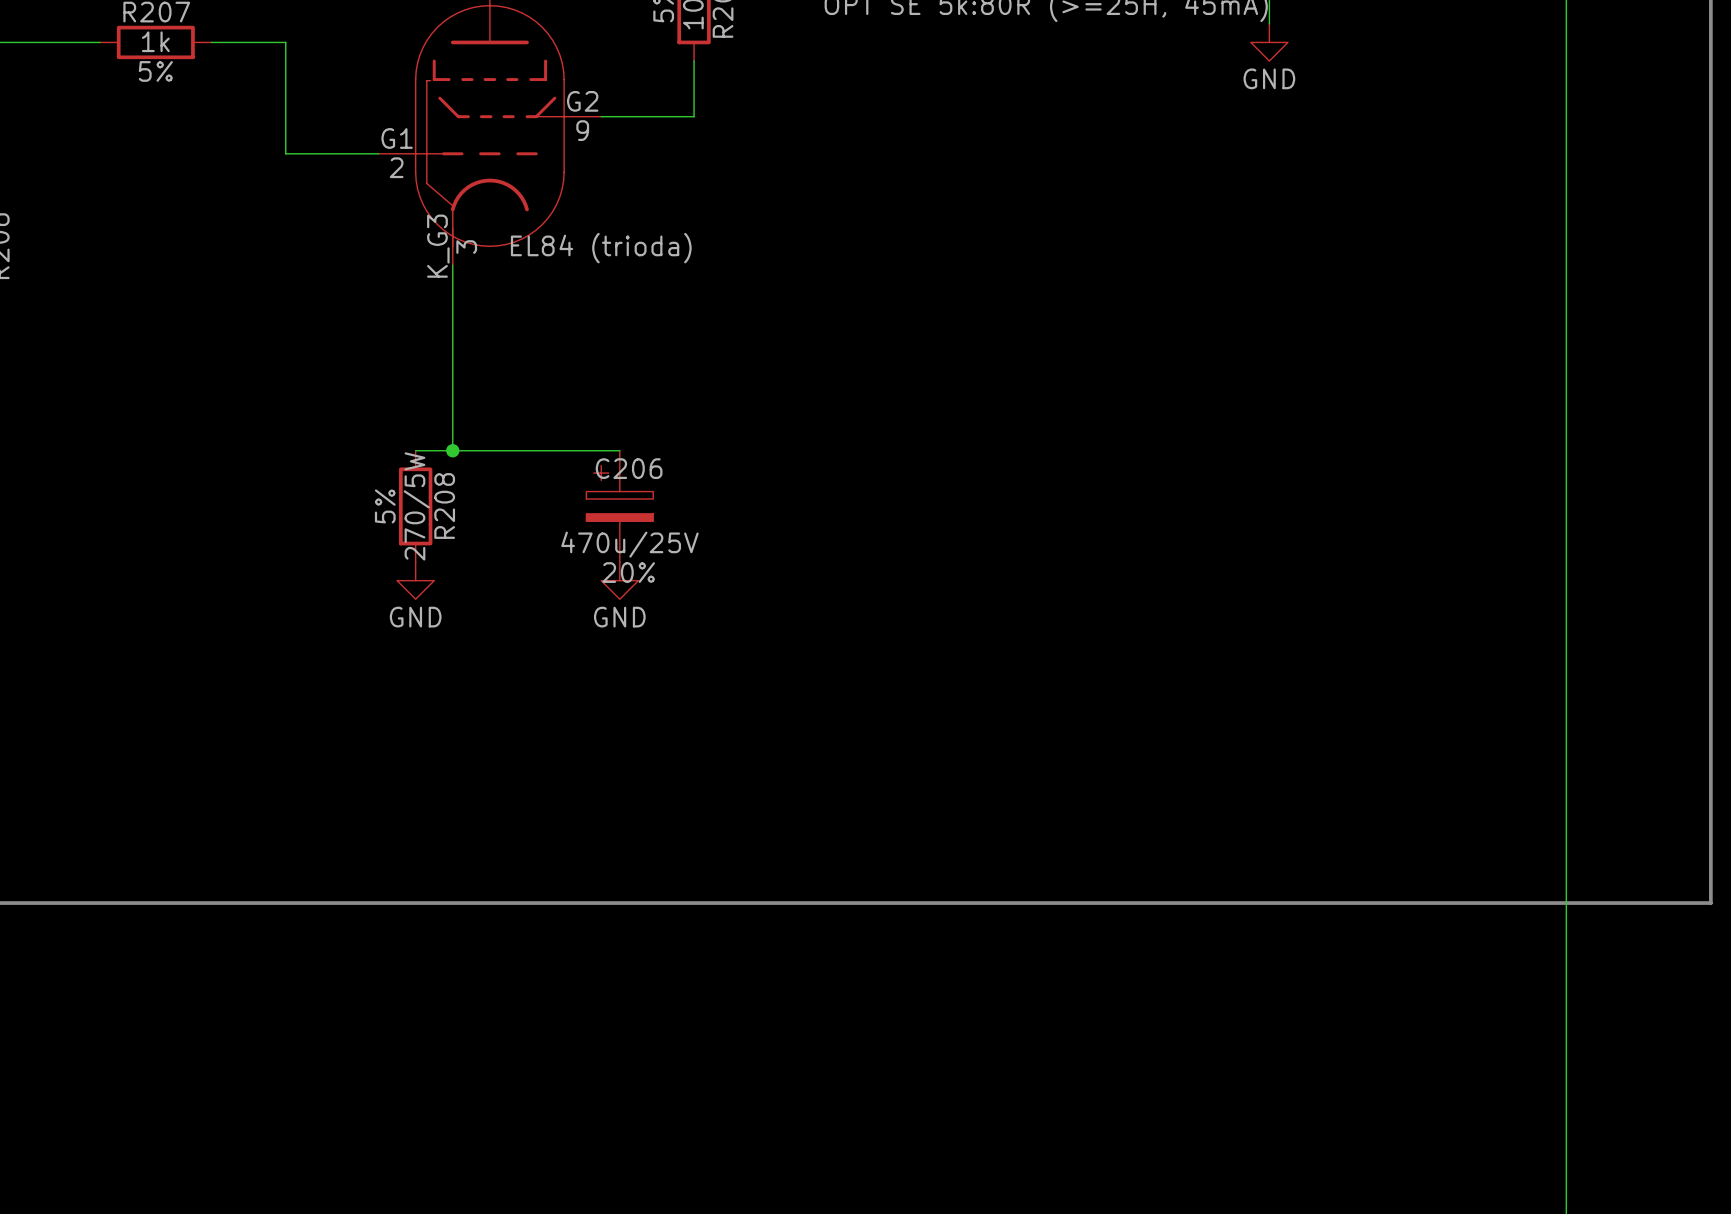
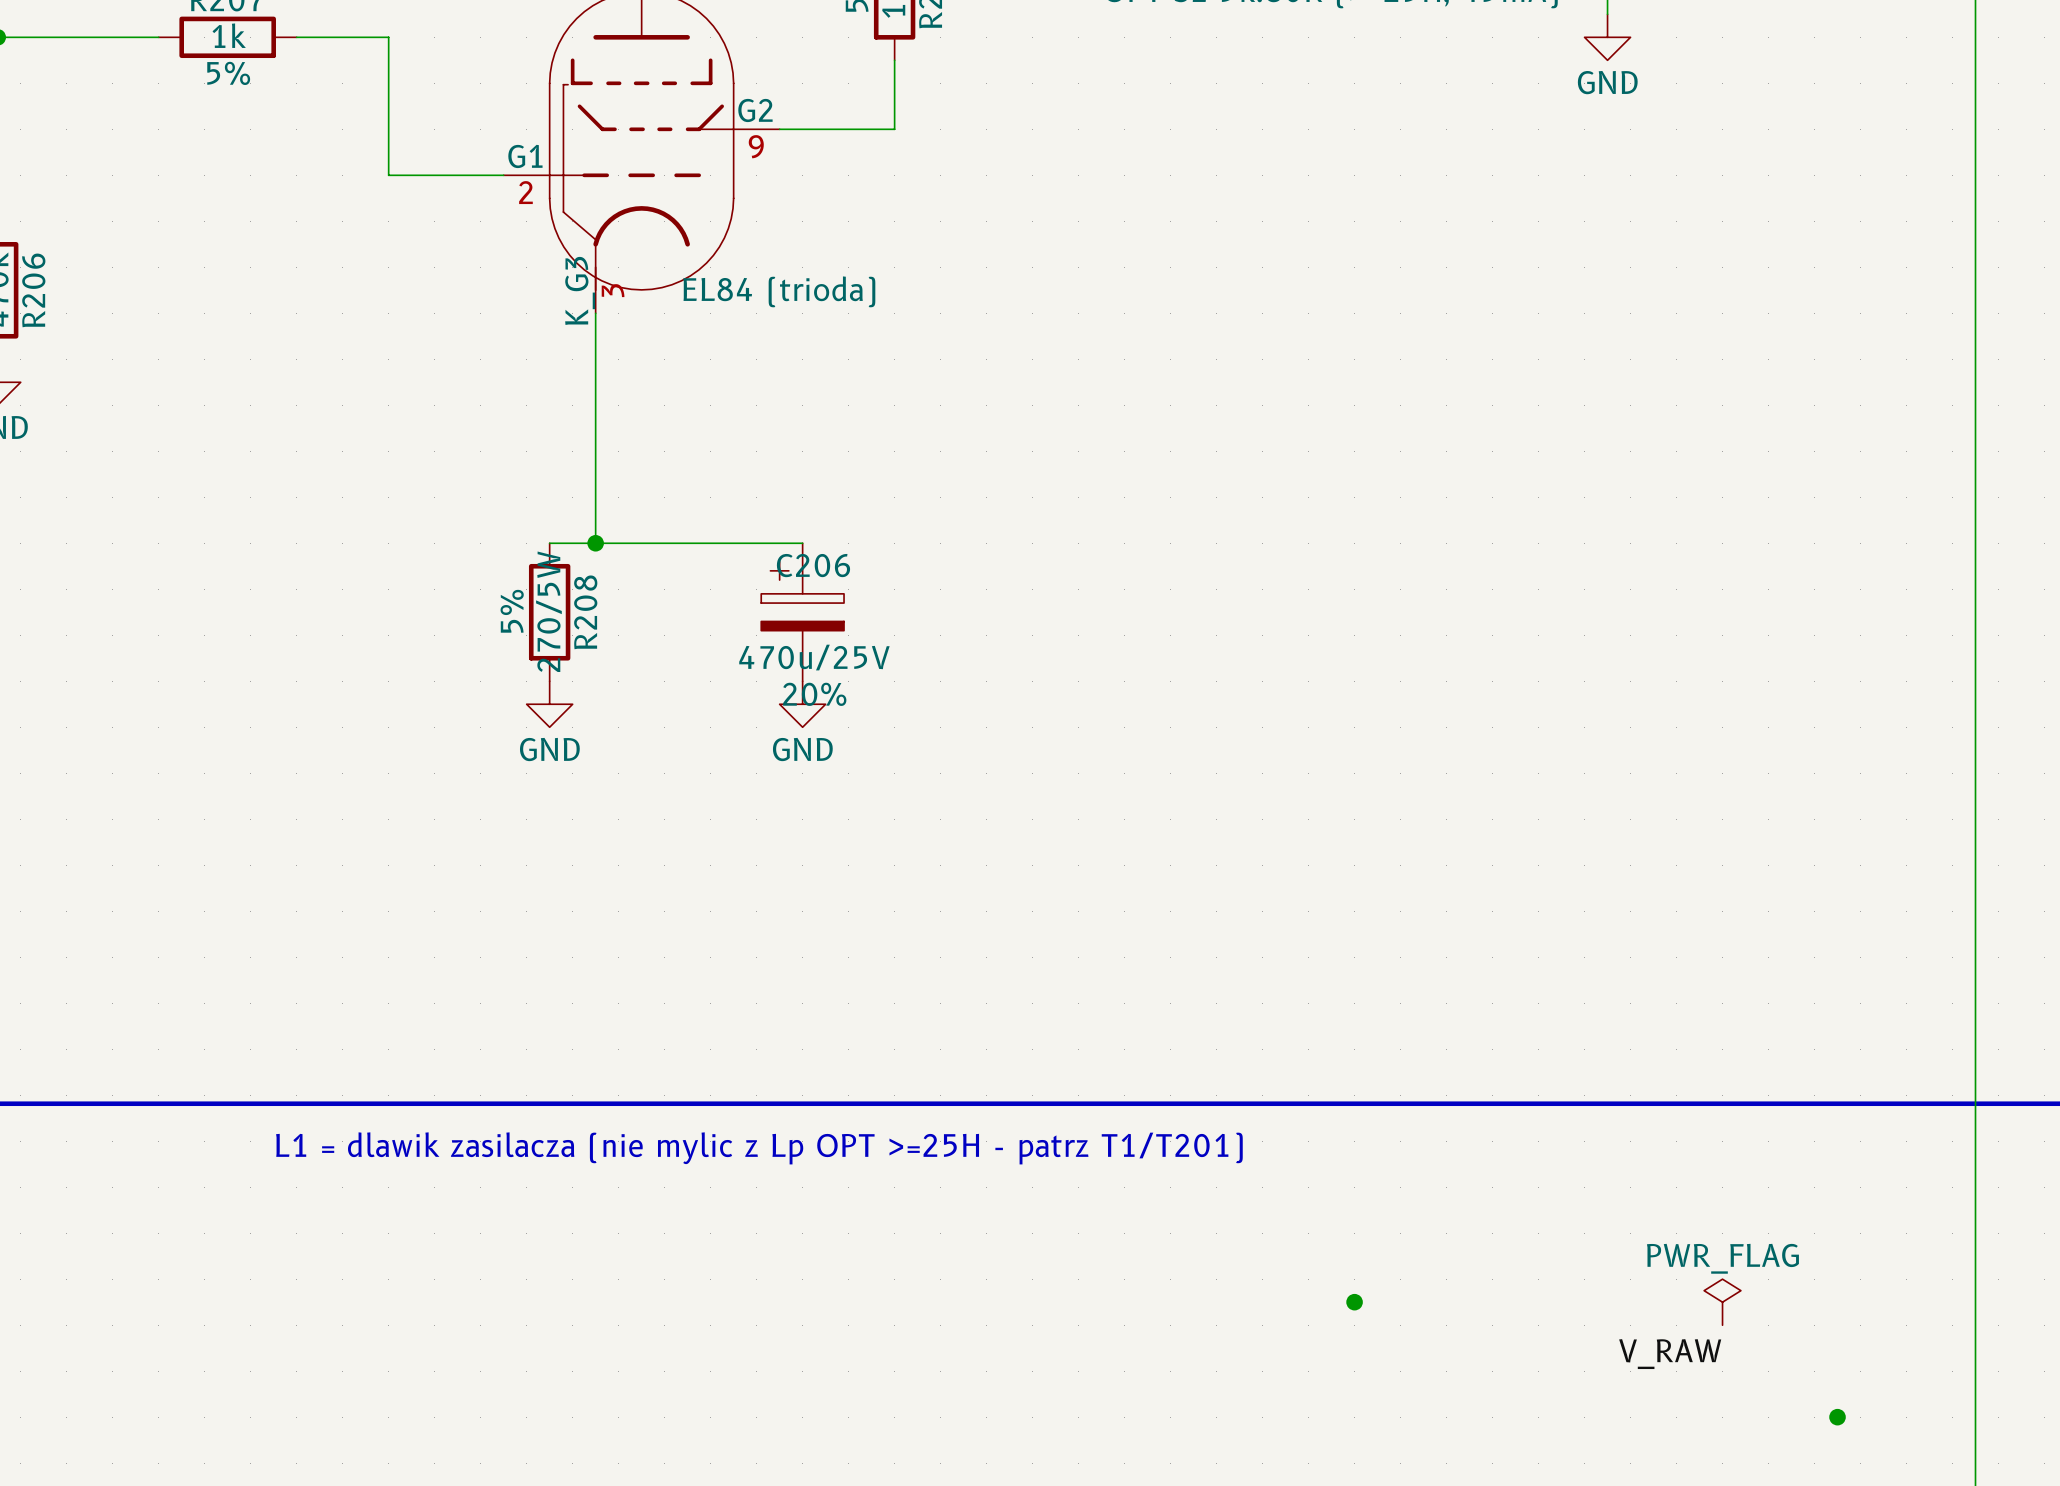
text: none -> L1 = dlawik zasilacza (nie mylic z Lp OPT >=25H - patrz T1/T201) (759, 1148)
junction: none -> (1354, 1302)
power symbol: none -> PWR_FLAG (1722, 1302)
label: none -> V_RAW (1670, 1354)
junction: none -> (1837, 1417)

